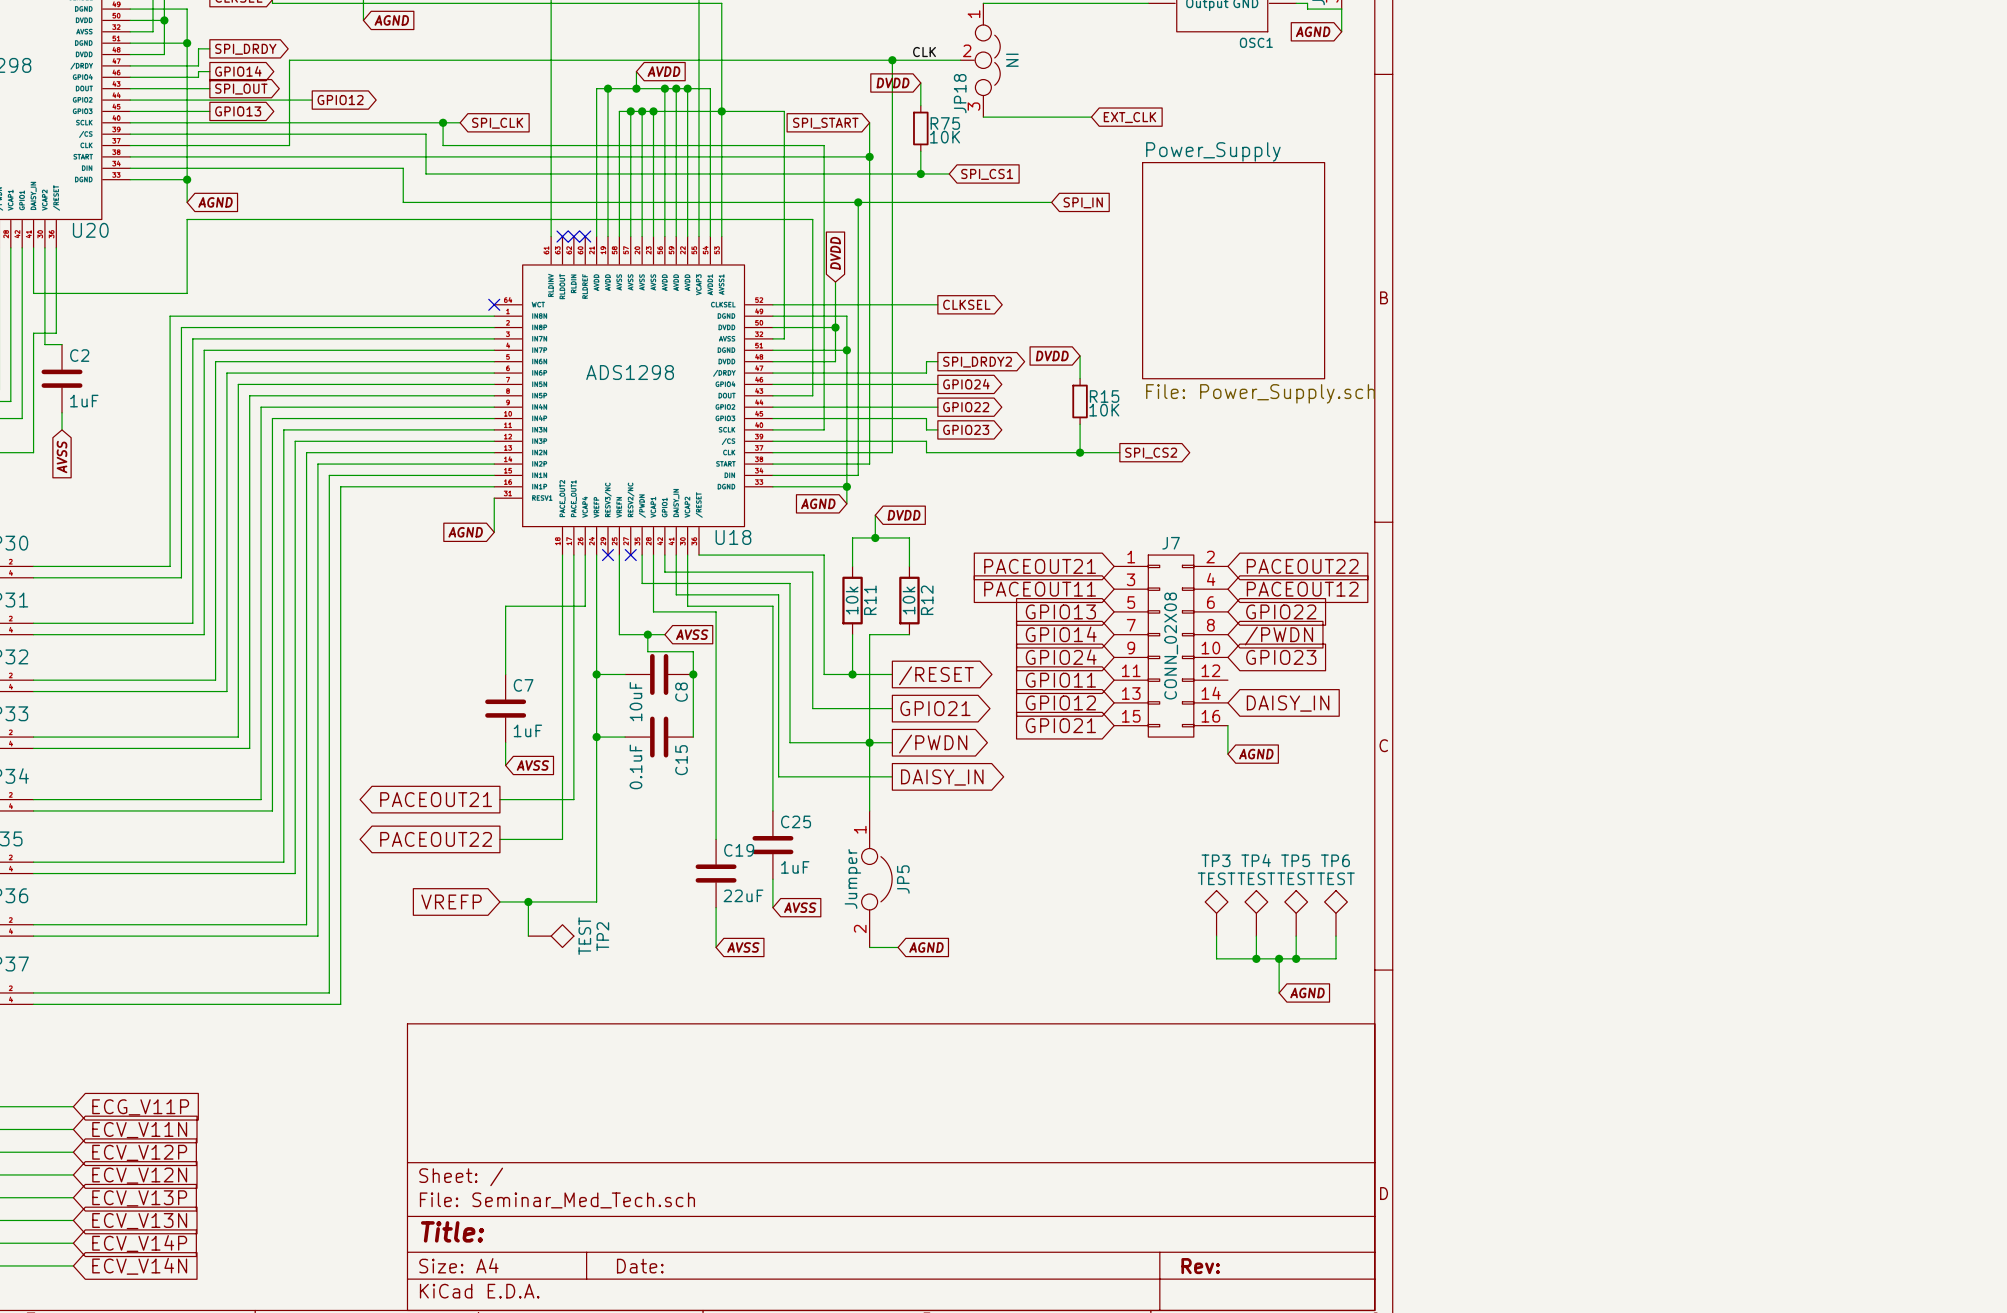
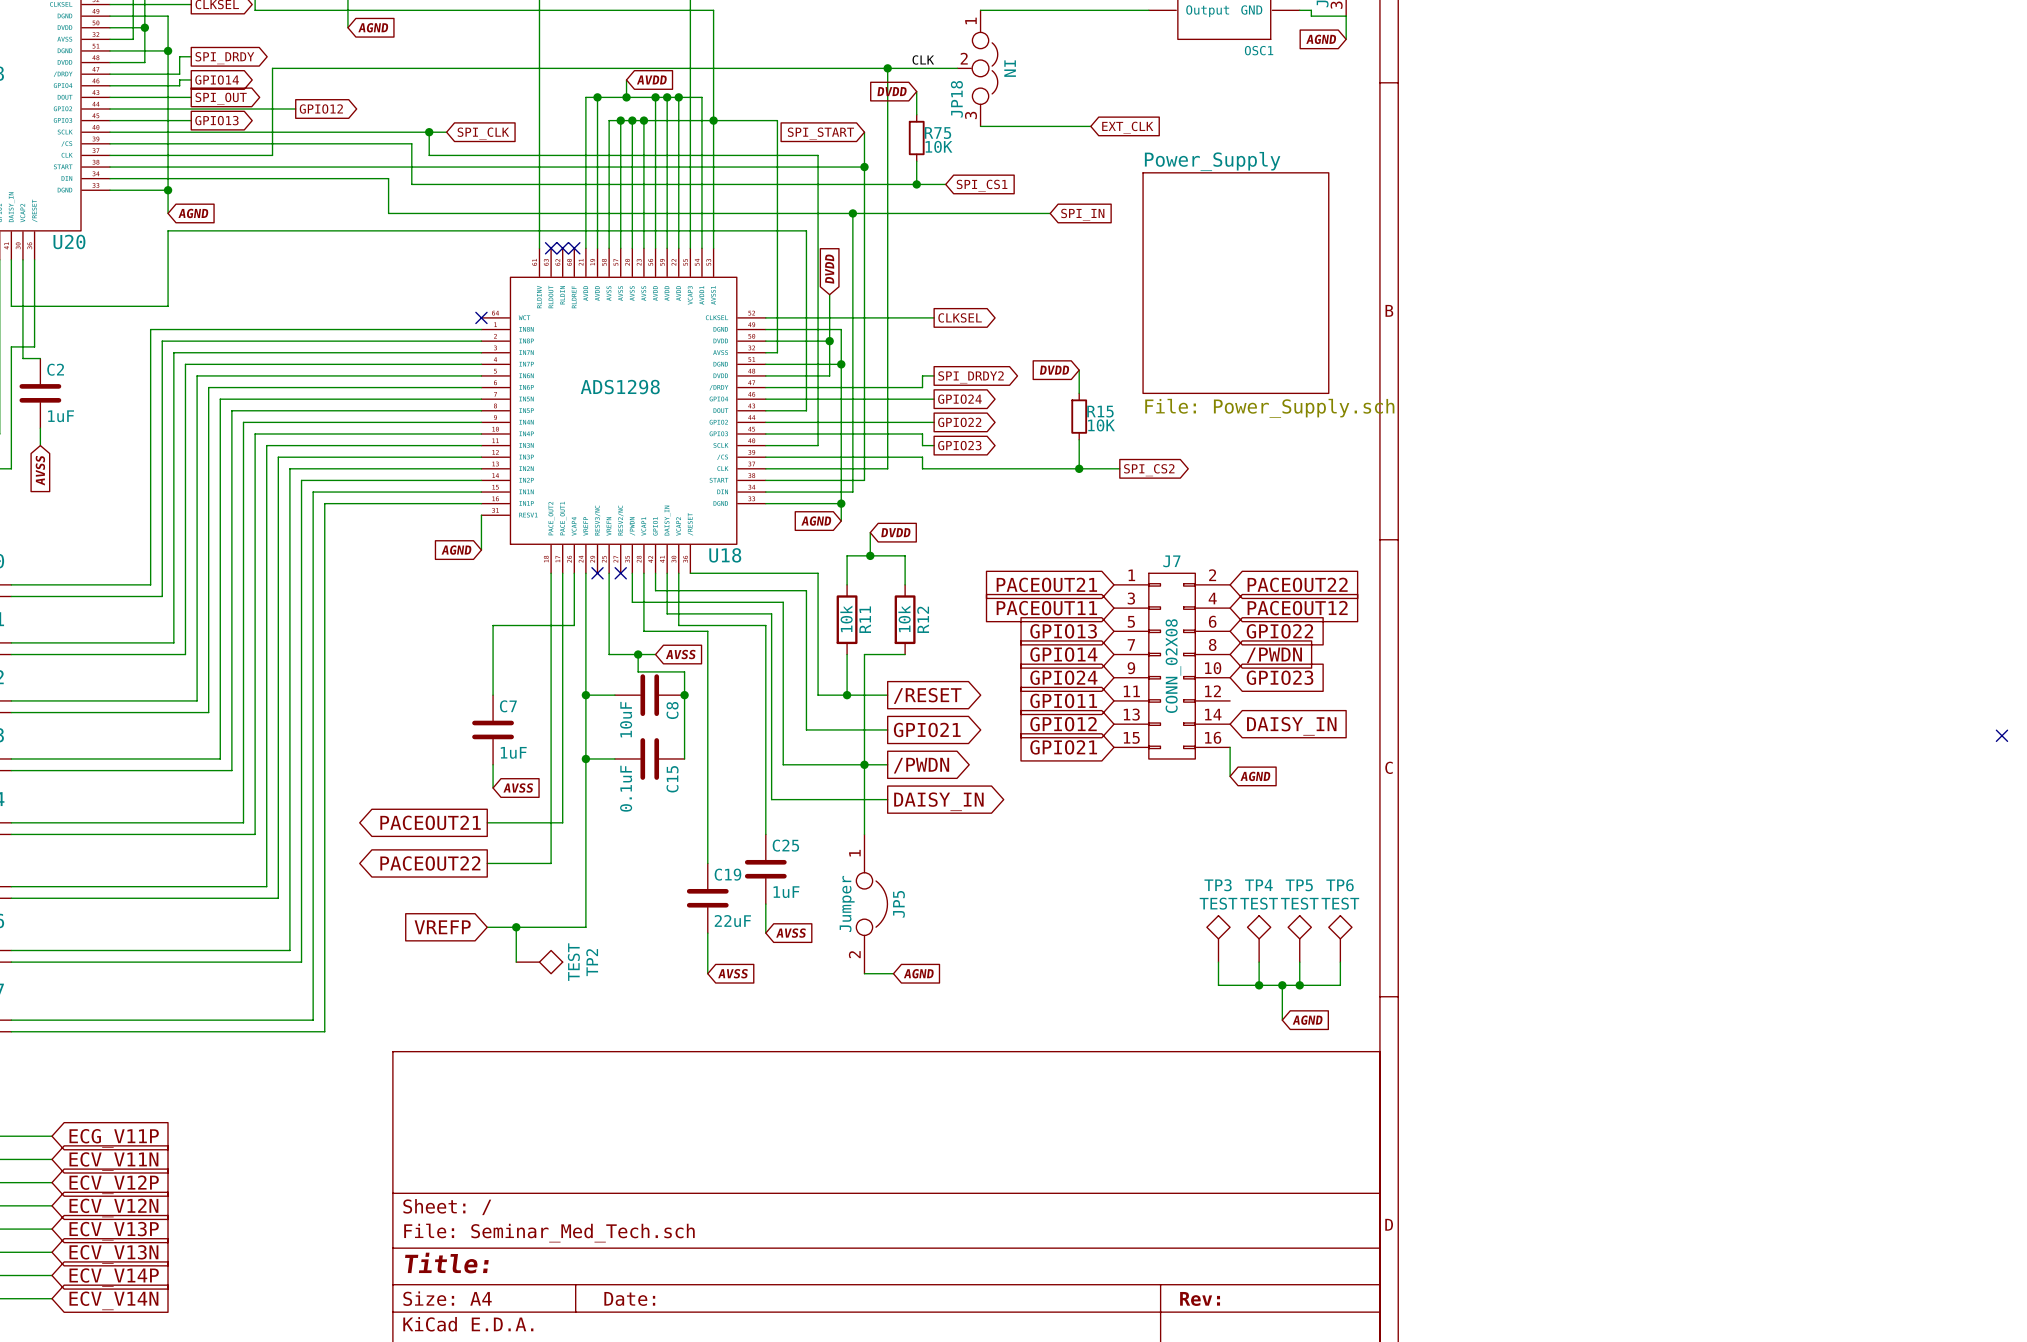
no-connect mark: none -> (2001, 735)

